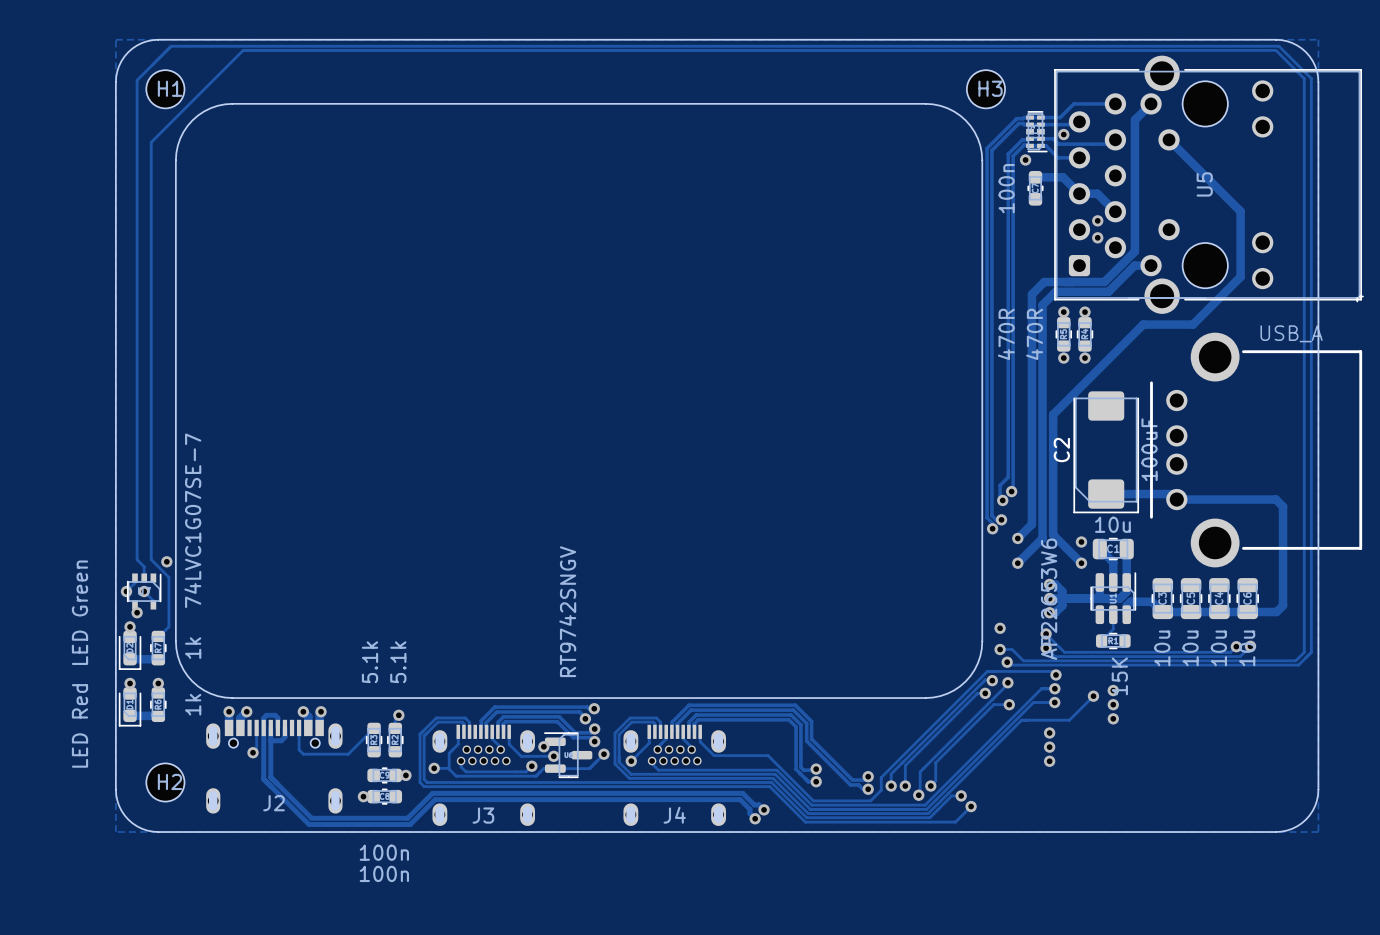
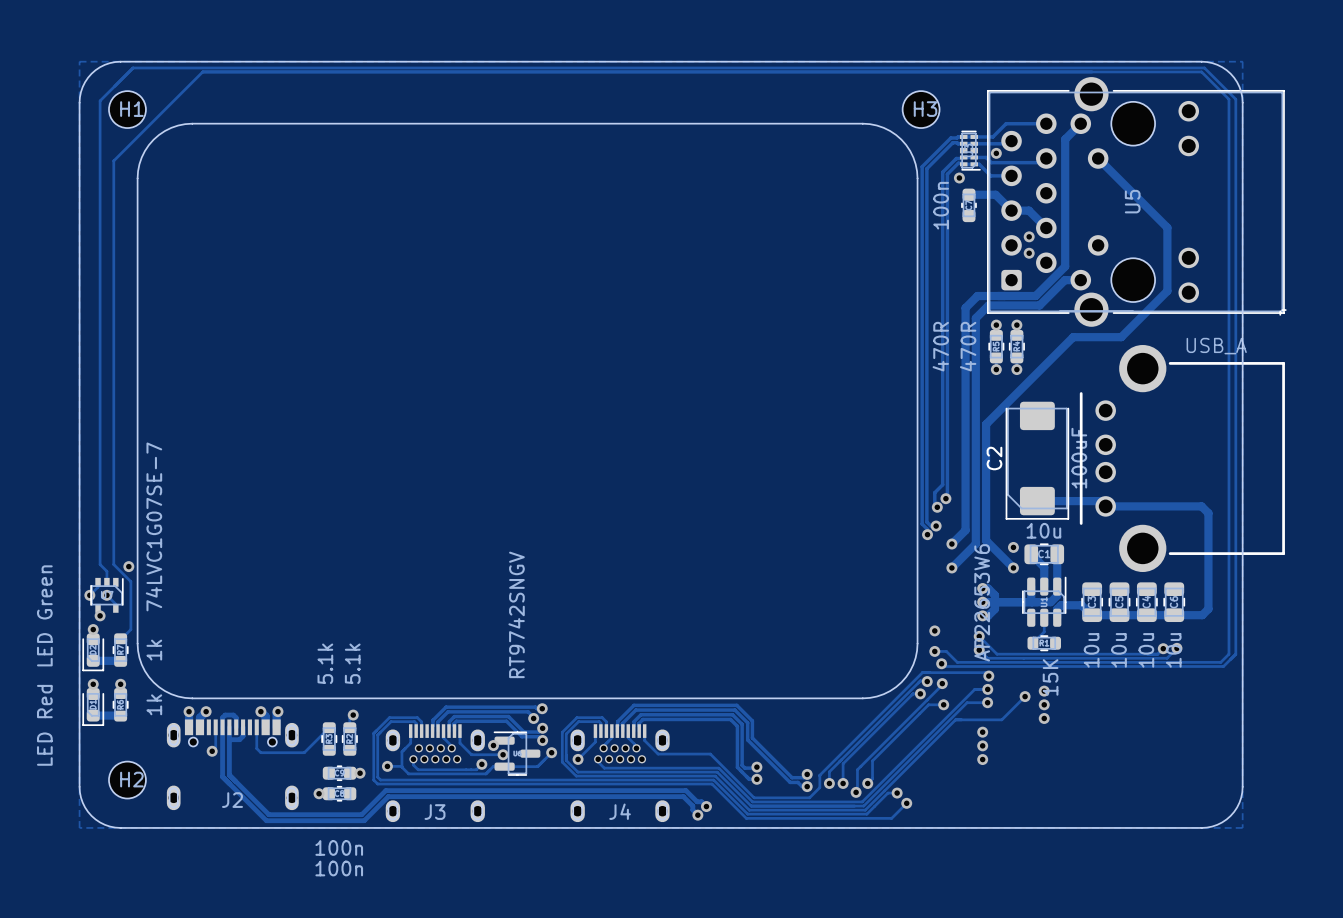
J2 footprint: [206, 719, 343, 814] -> [166, 719, 299, 811]
J3 footprint: [432, 724, 536, 827] -> [385, 724, 485, 823]
J4 footprint: [623, 724, 727, 827] -> [570, 724, 670, 823]

